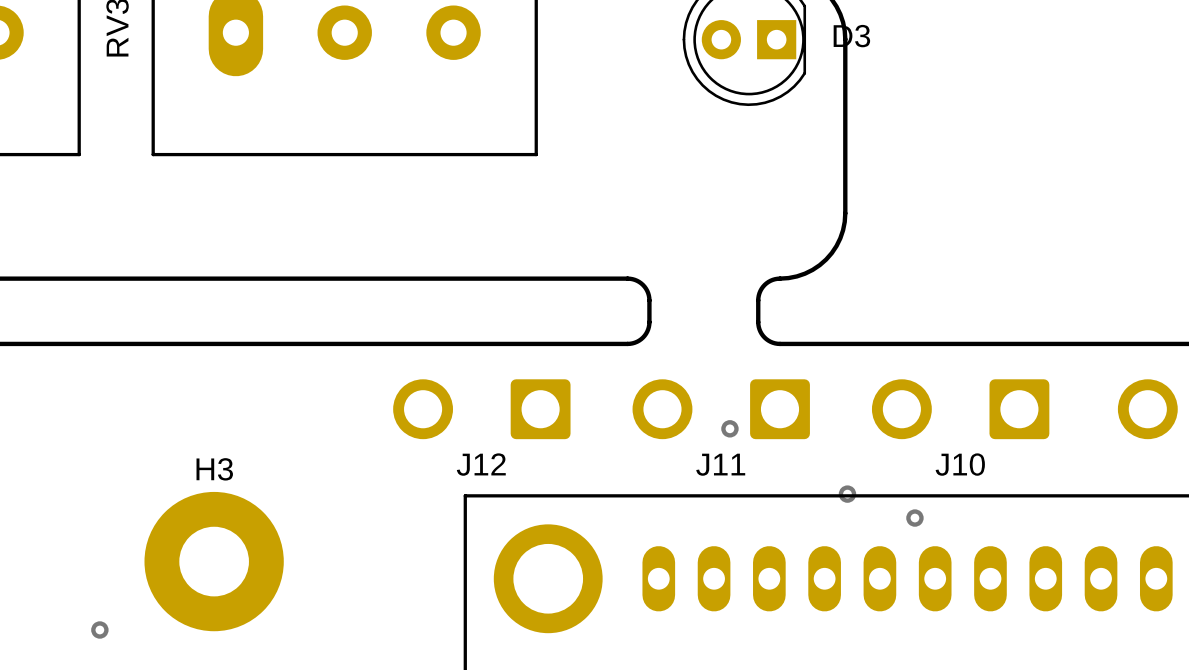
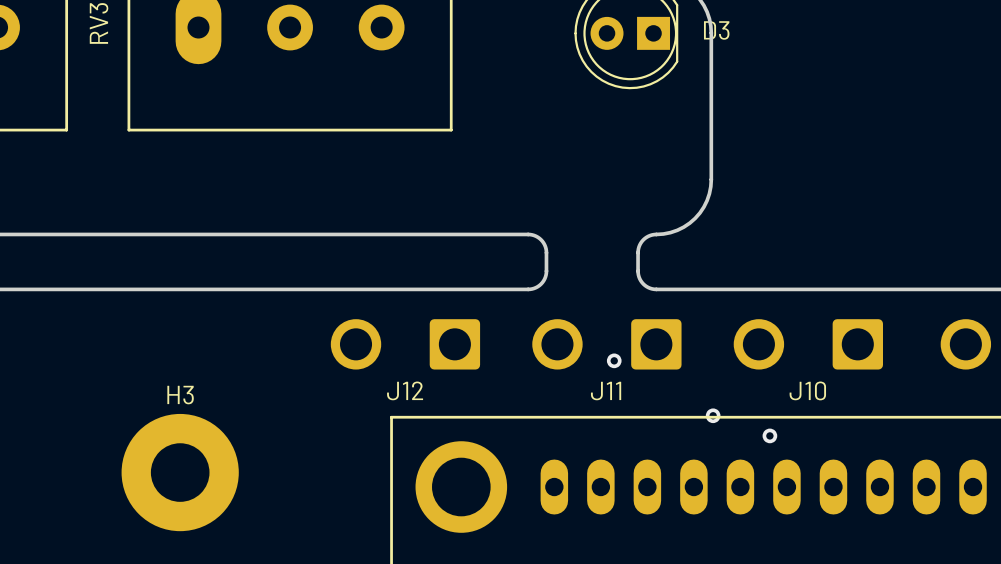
via: (99, 629) -> none

